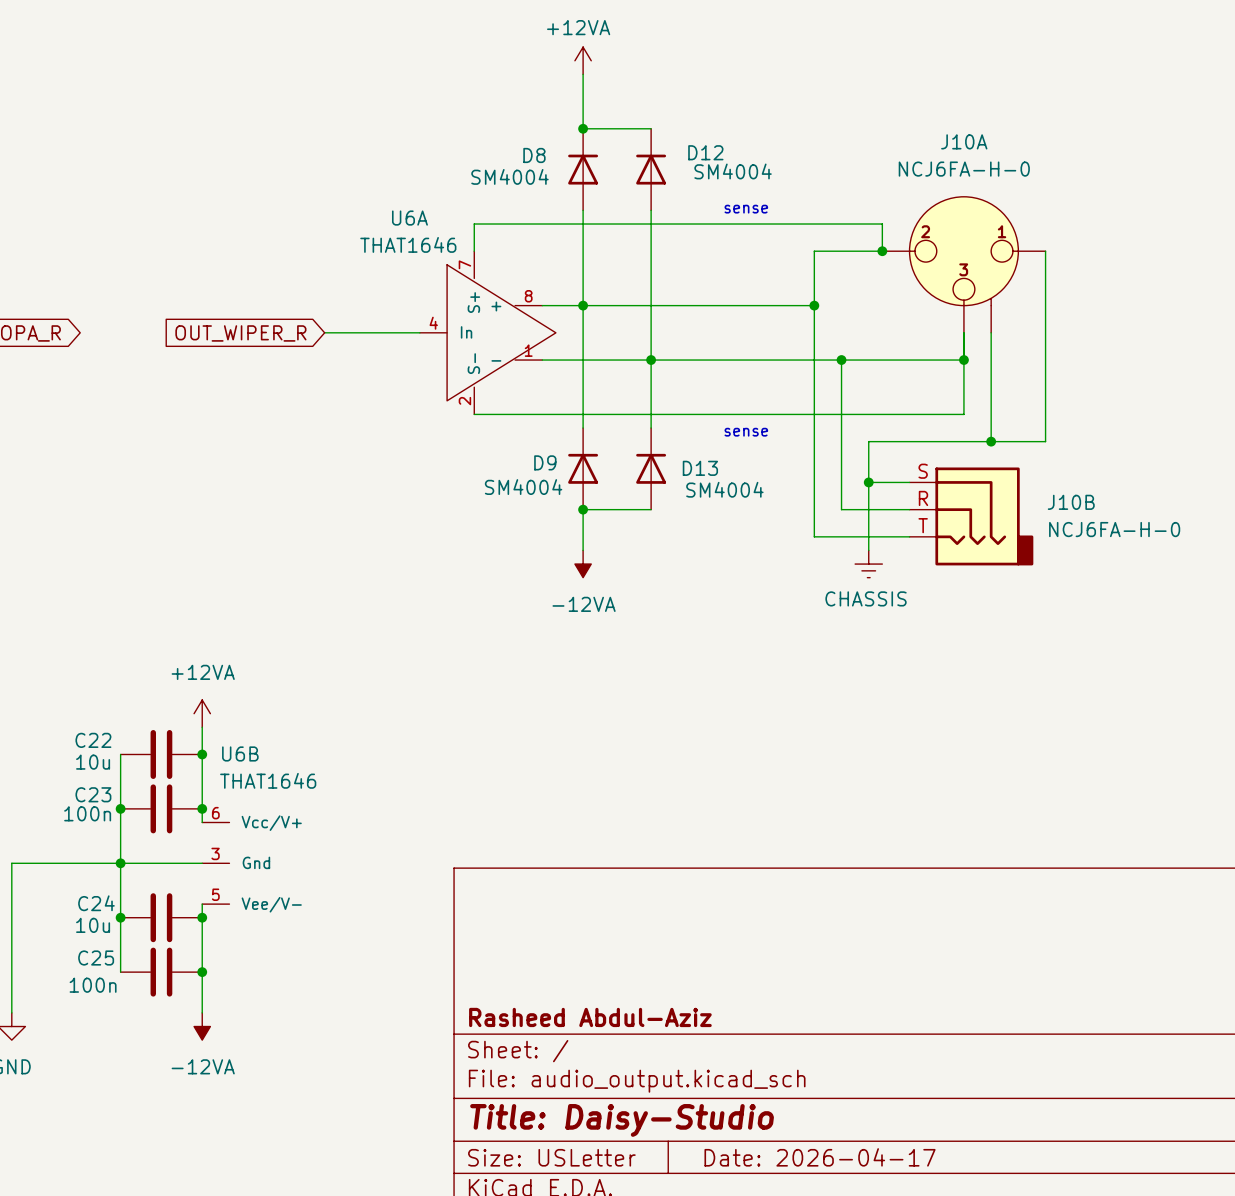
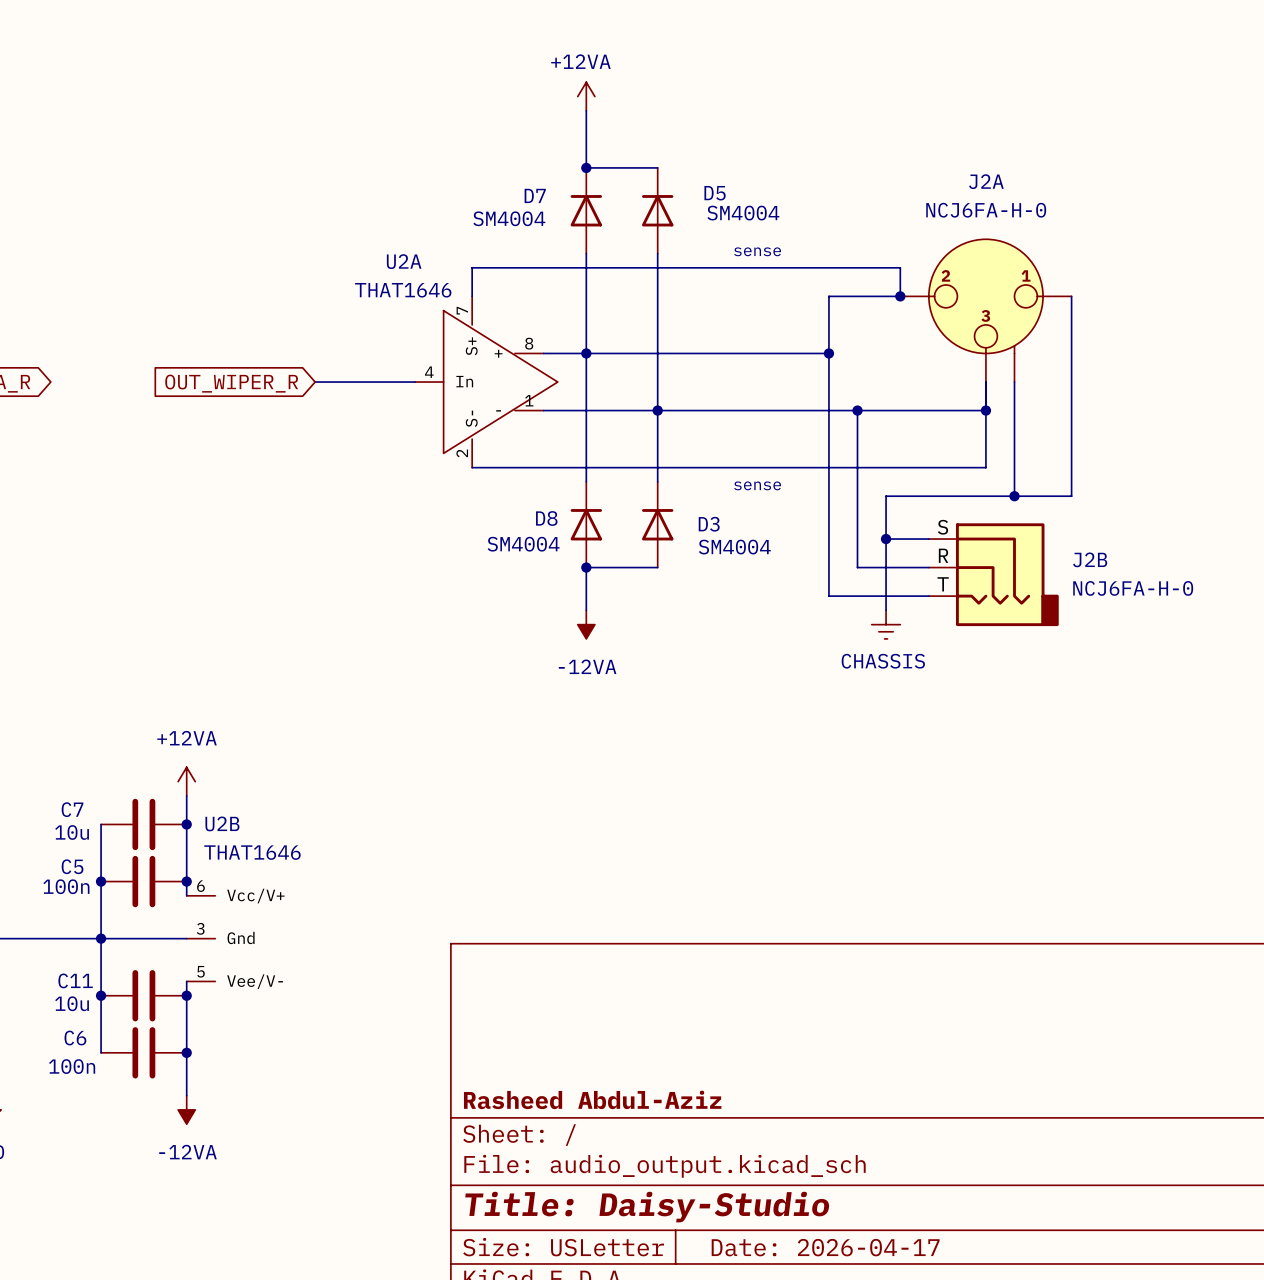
J10A name: J10A (964, 141) -> J2A (986, 181)
D12 name: D12 (705, 152) -> D5 (715, 193)
D8 name: D8 (534, 155) -> D7 (535, 195)
U6A name: U6A (409, 218) -> U2A (404, 261)
D9 name: D9 (545, 462) -> D8 (546, 518)
D13 name: D13 (700, 468) -> D3 (709, 524)
J10B name: J10B (1071, 502) -> J2B (1090, 559)
C22 name: C22 (93, 740) -> C7 (72, 809)
U6B name: U6B (240, 753) -> U2B (222, 823)
C23 name: C23 (93, 794) -> C5 (72, 866)
C24 name: C24 (96, 903) -> C11 (75, 980)
C25 name: C25 (96, 958) -> C6 (75, 1038)

